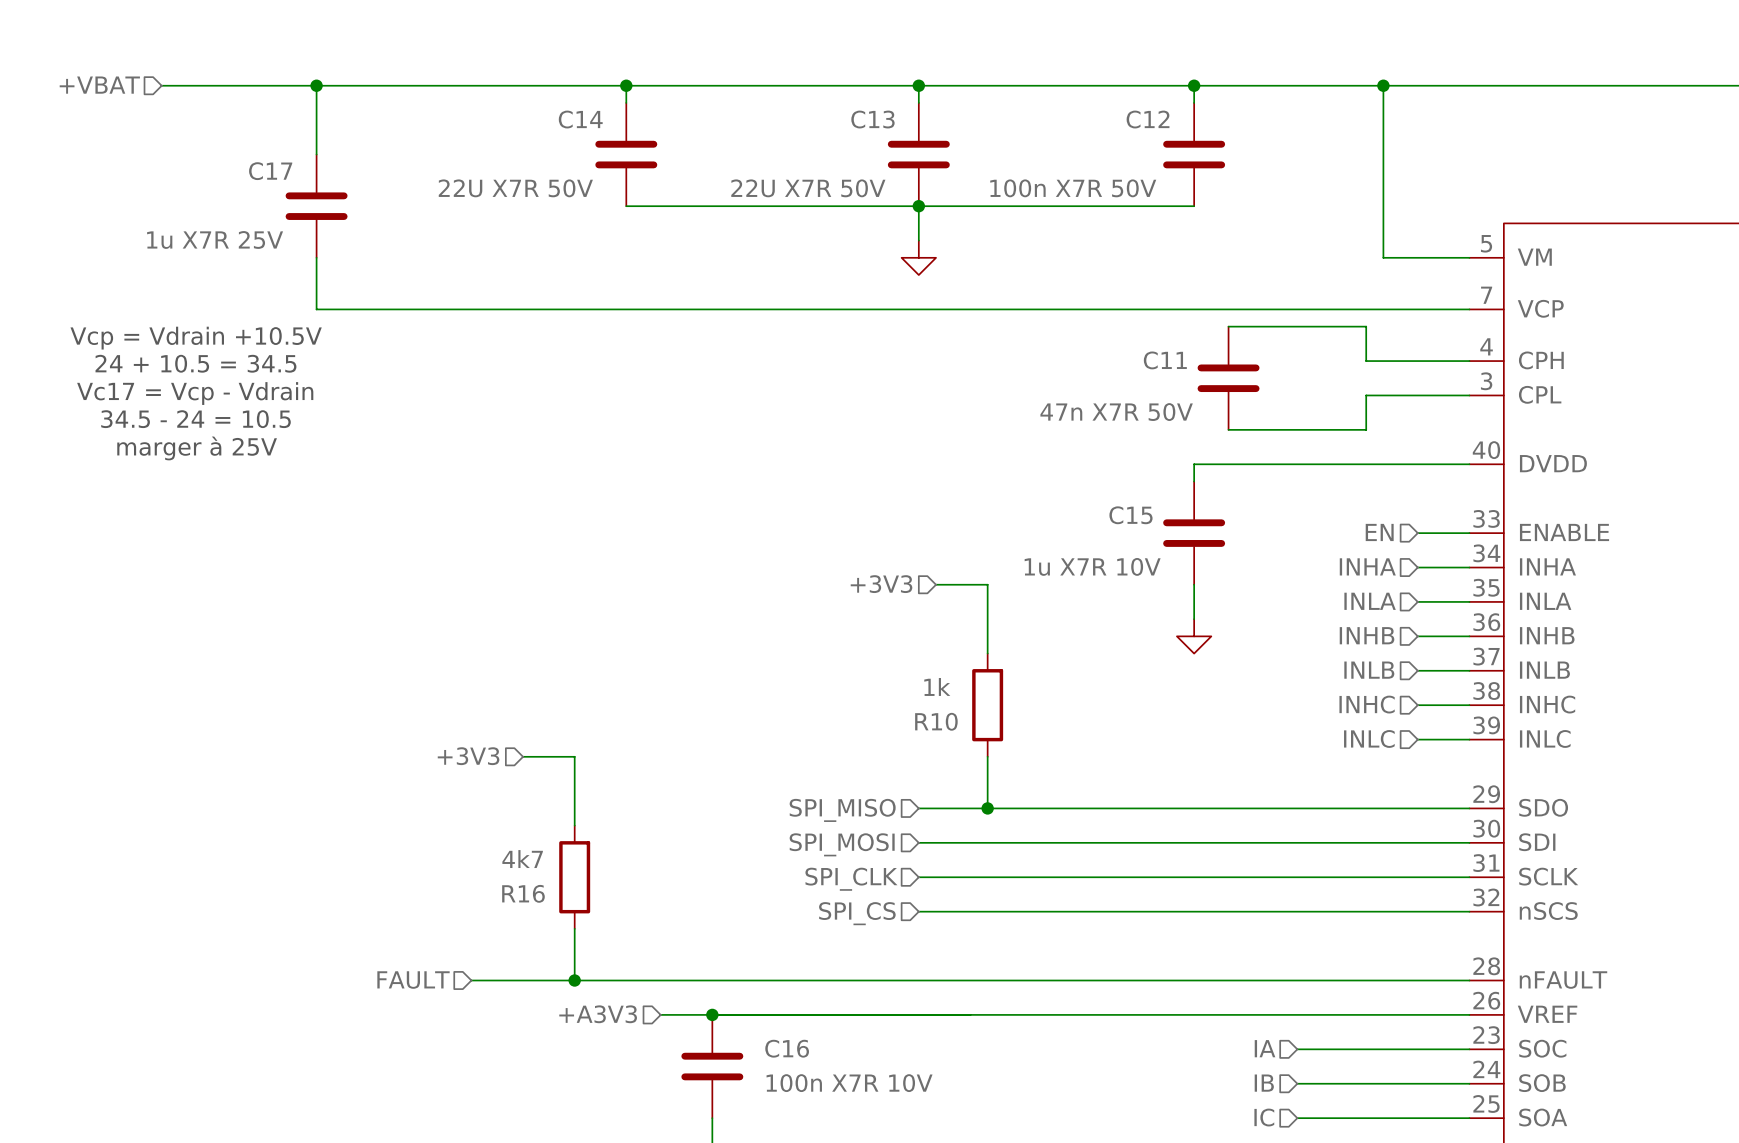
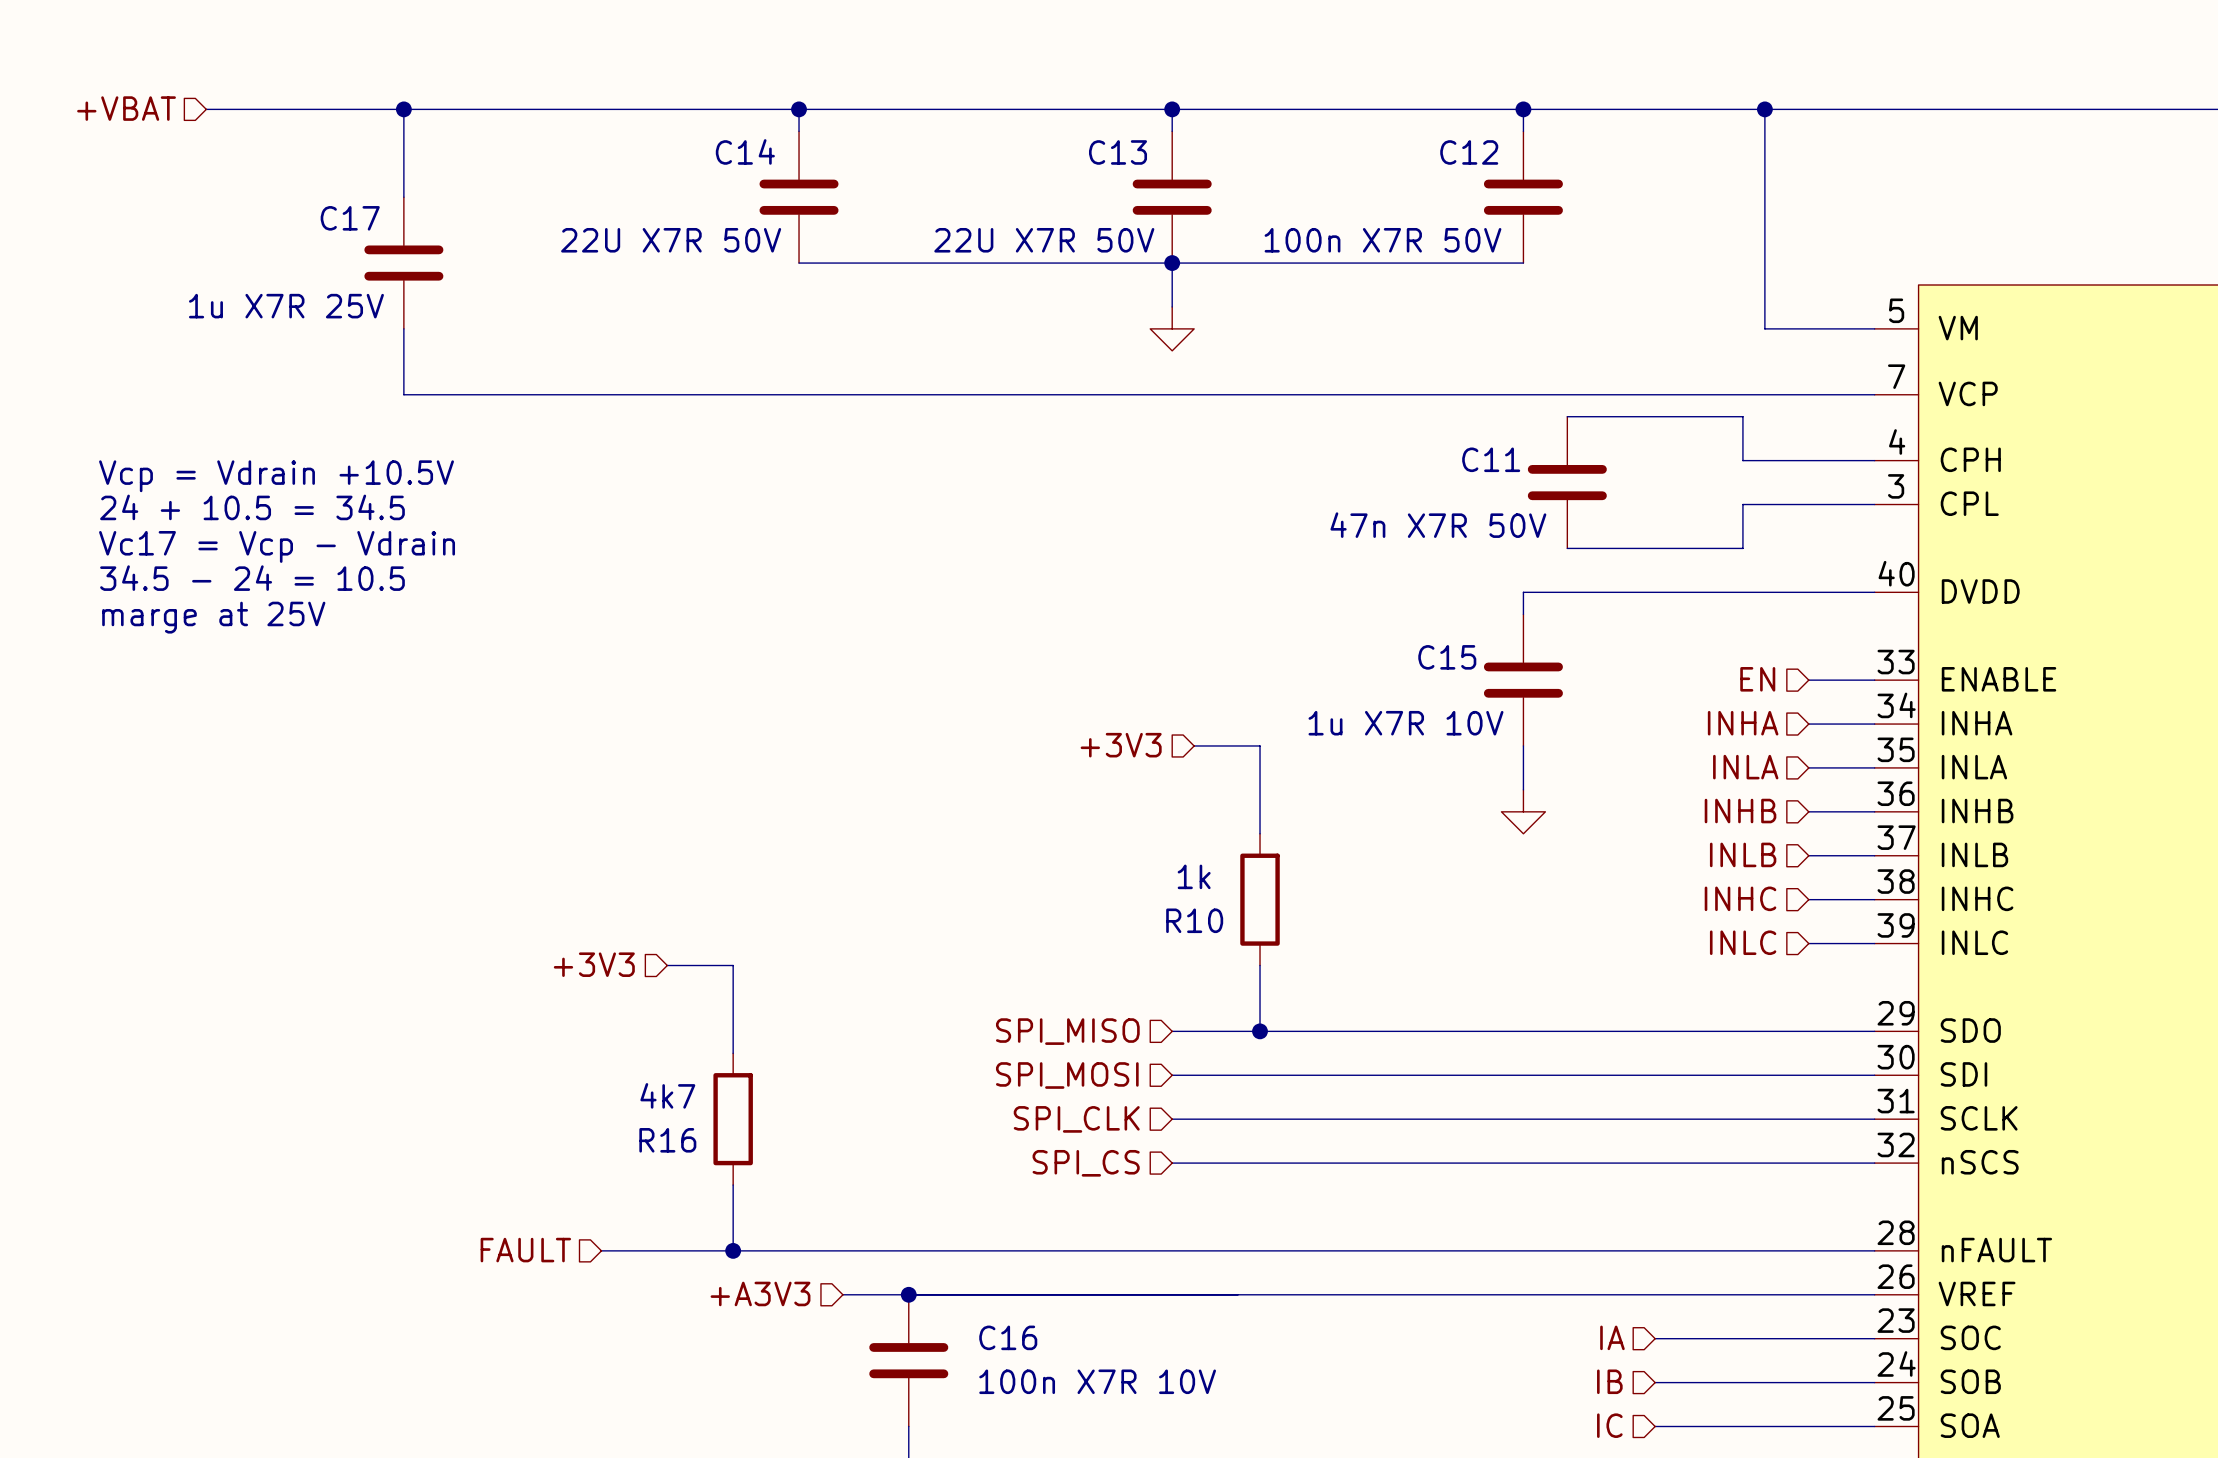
text position: Vcp = Vdrain +10.5V (196, 338) -> Vcp = Vdrain +10.5V (276, 476)
text position: 24 + 10.5 = 34.5 (195, 363) -> 24 + 10.5 = 34.5 (252, 507)
text position: Vc17 = Vcp - Vdrain (195, 393) -> Vc17 = Vcp - Vdrain (277, 546)
text position: 34.5 - 24 = 10.5 (196, 419) -> 34.5 - 24 = 10.5 (252, 578)
text: marger à 25V (197, 448) -> marge at 25V (213, 617)

